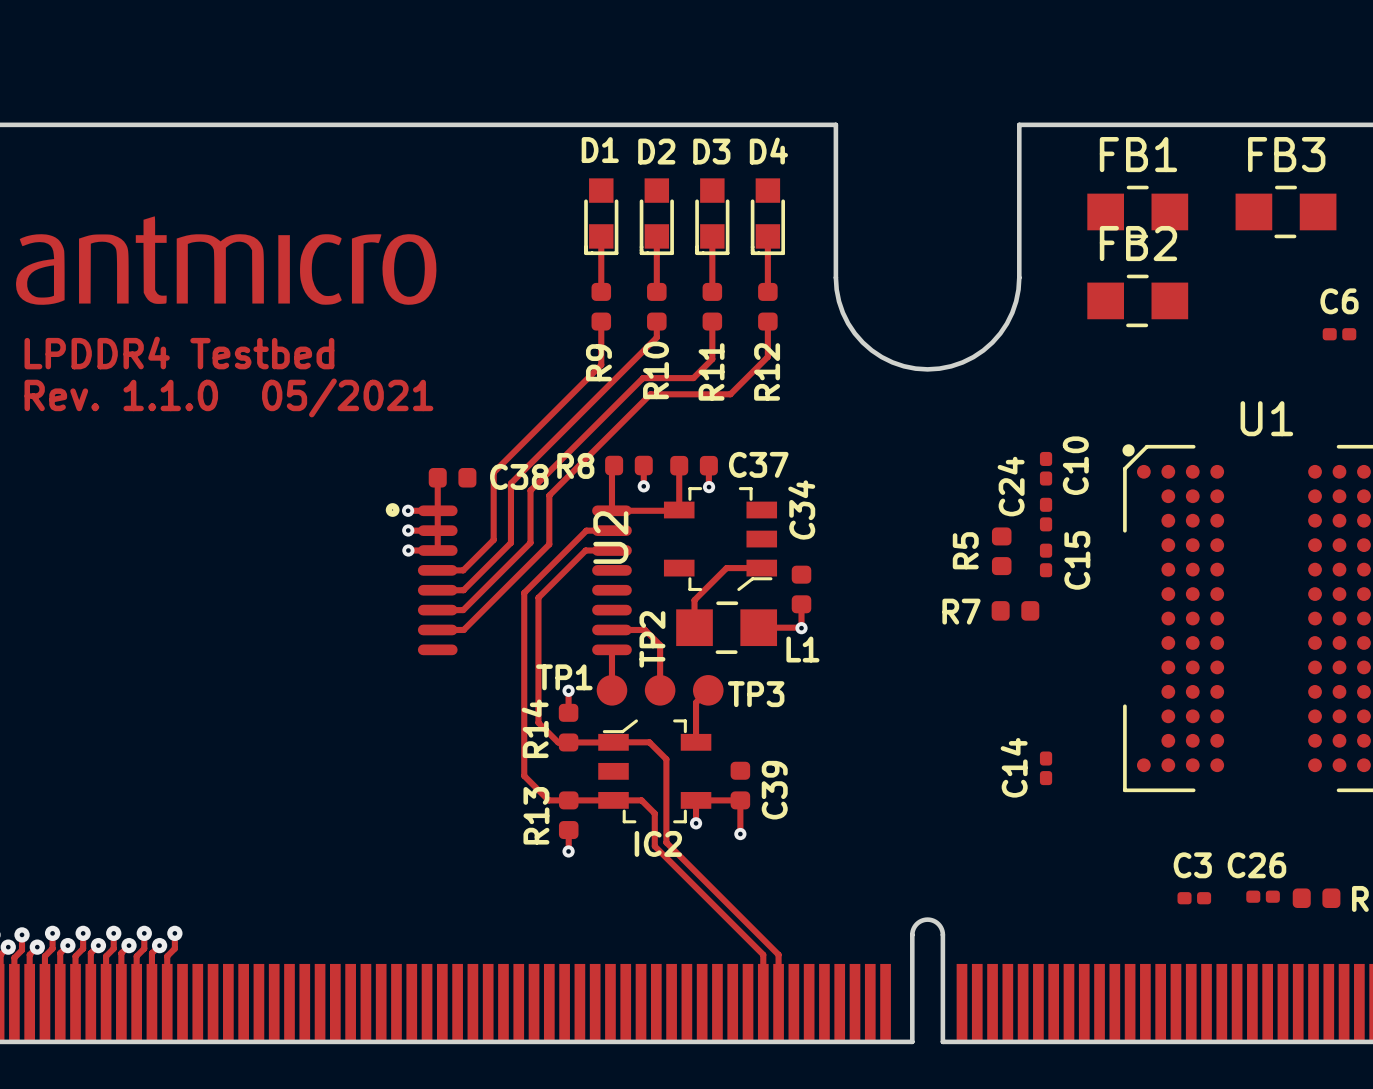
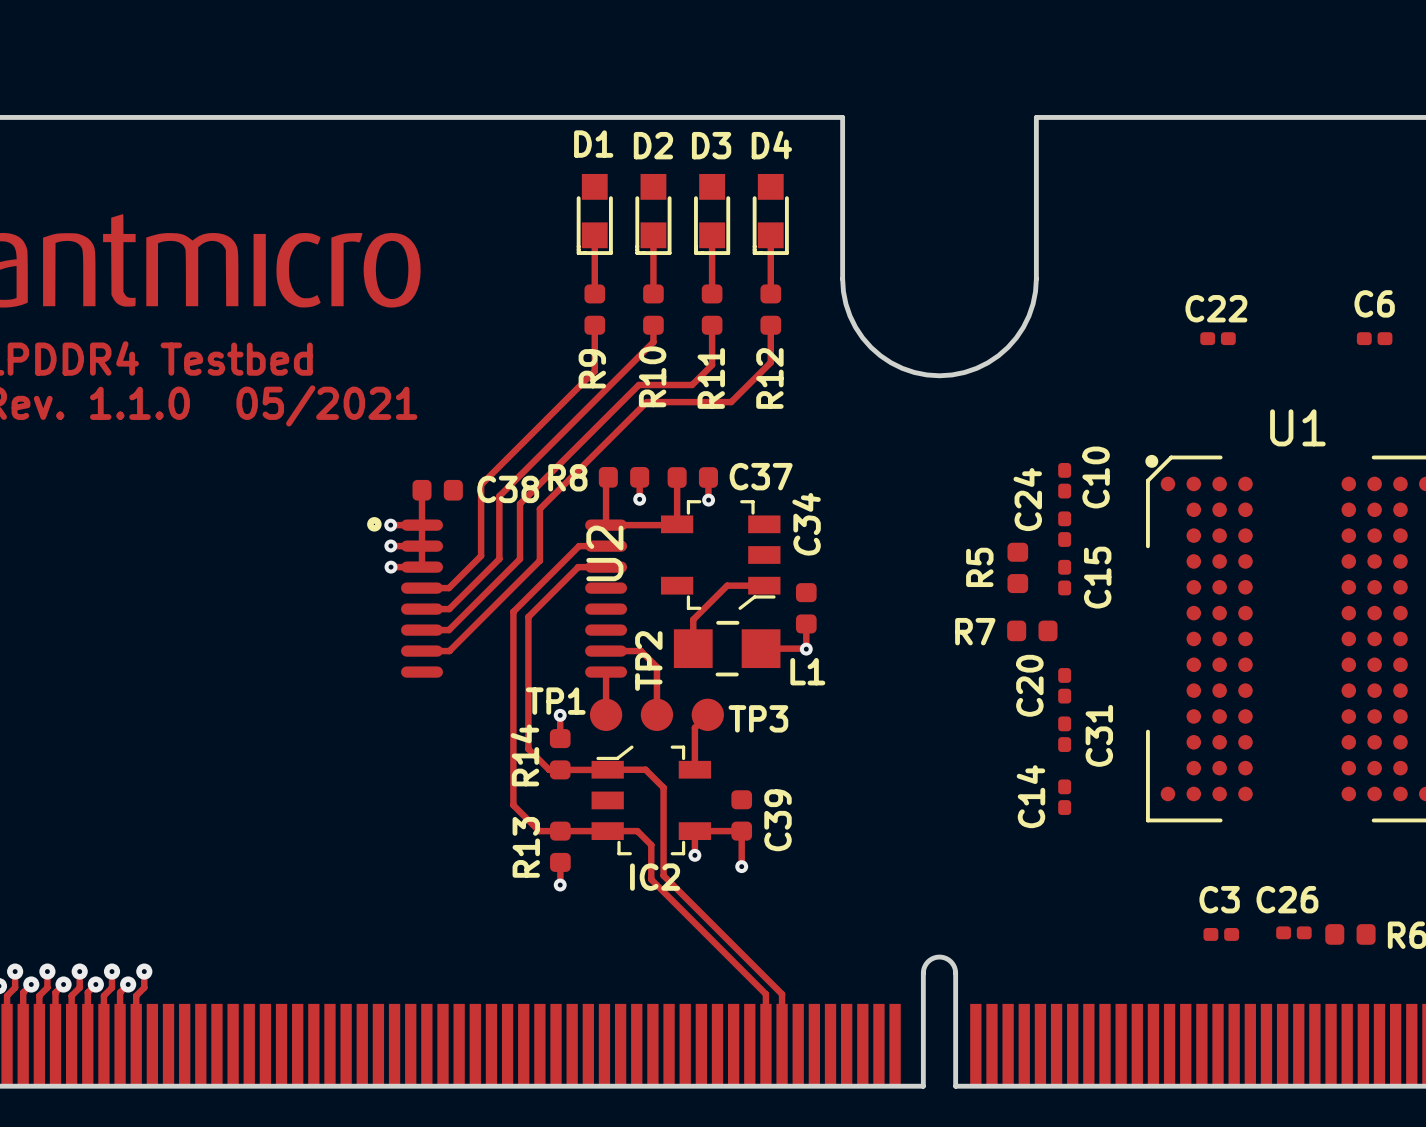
FB1: (1137, 211) -> none
FB3: (1286, 211) -> none
FB2: (1137, 300) -> none
C22: none -> (1218, 338)
C20: none -> (1064, 685)
C31: none -> (1064, 734)

